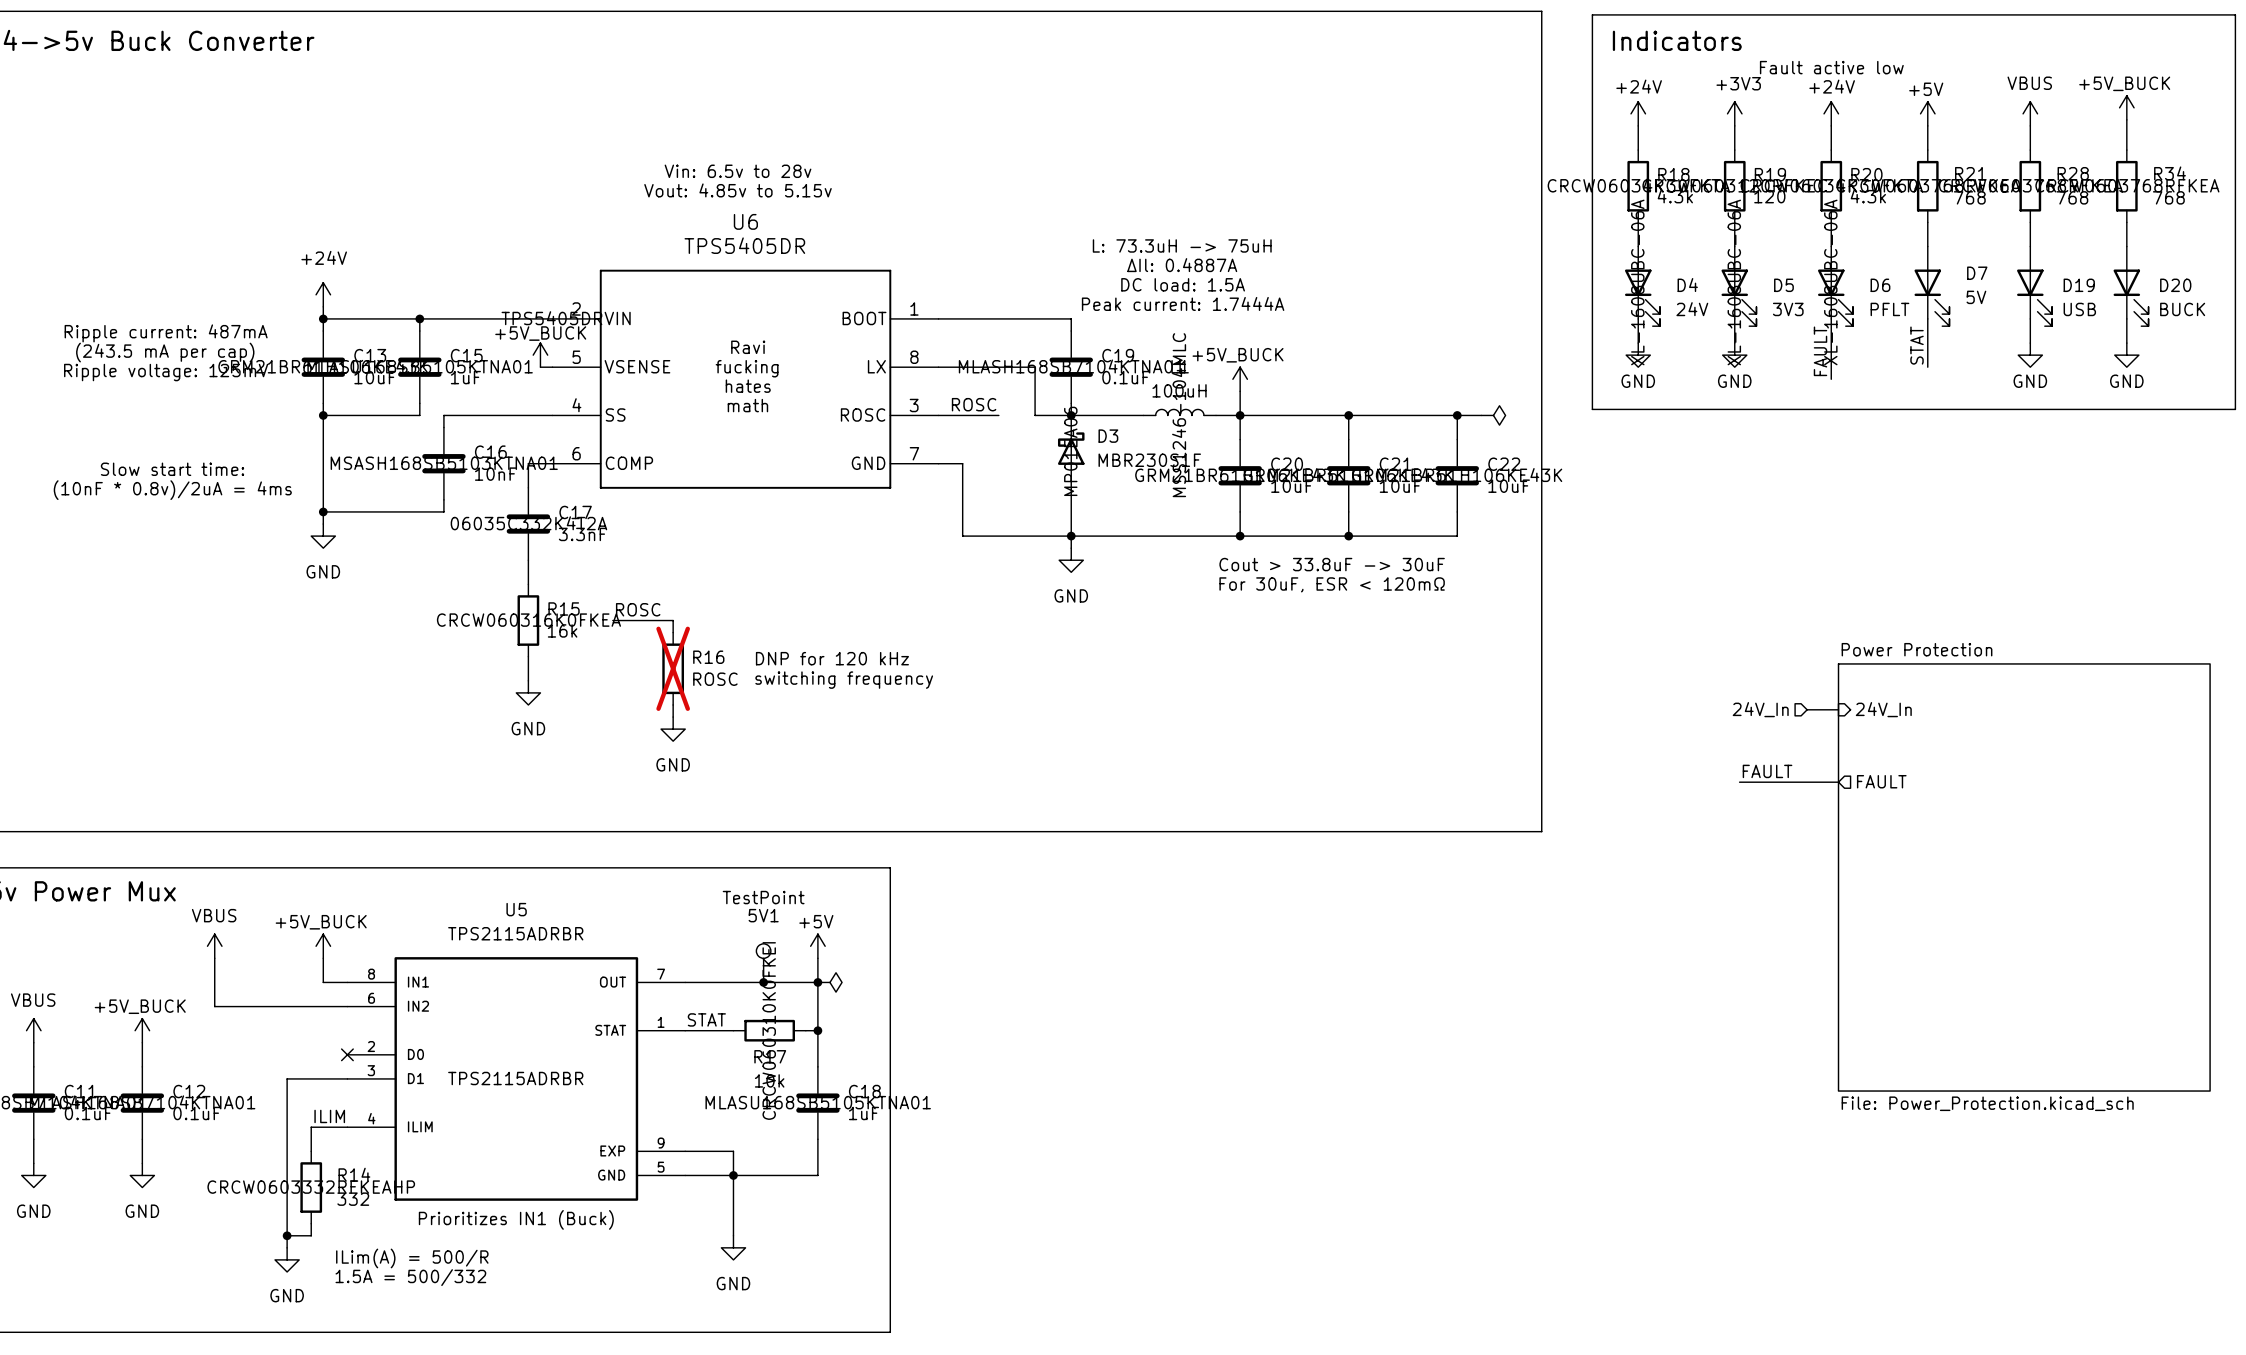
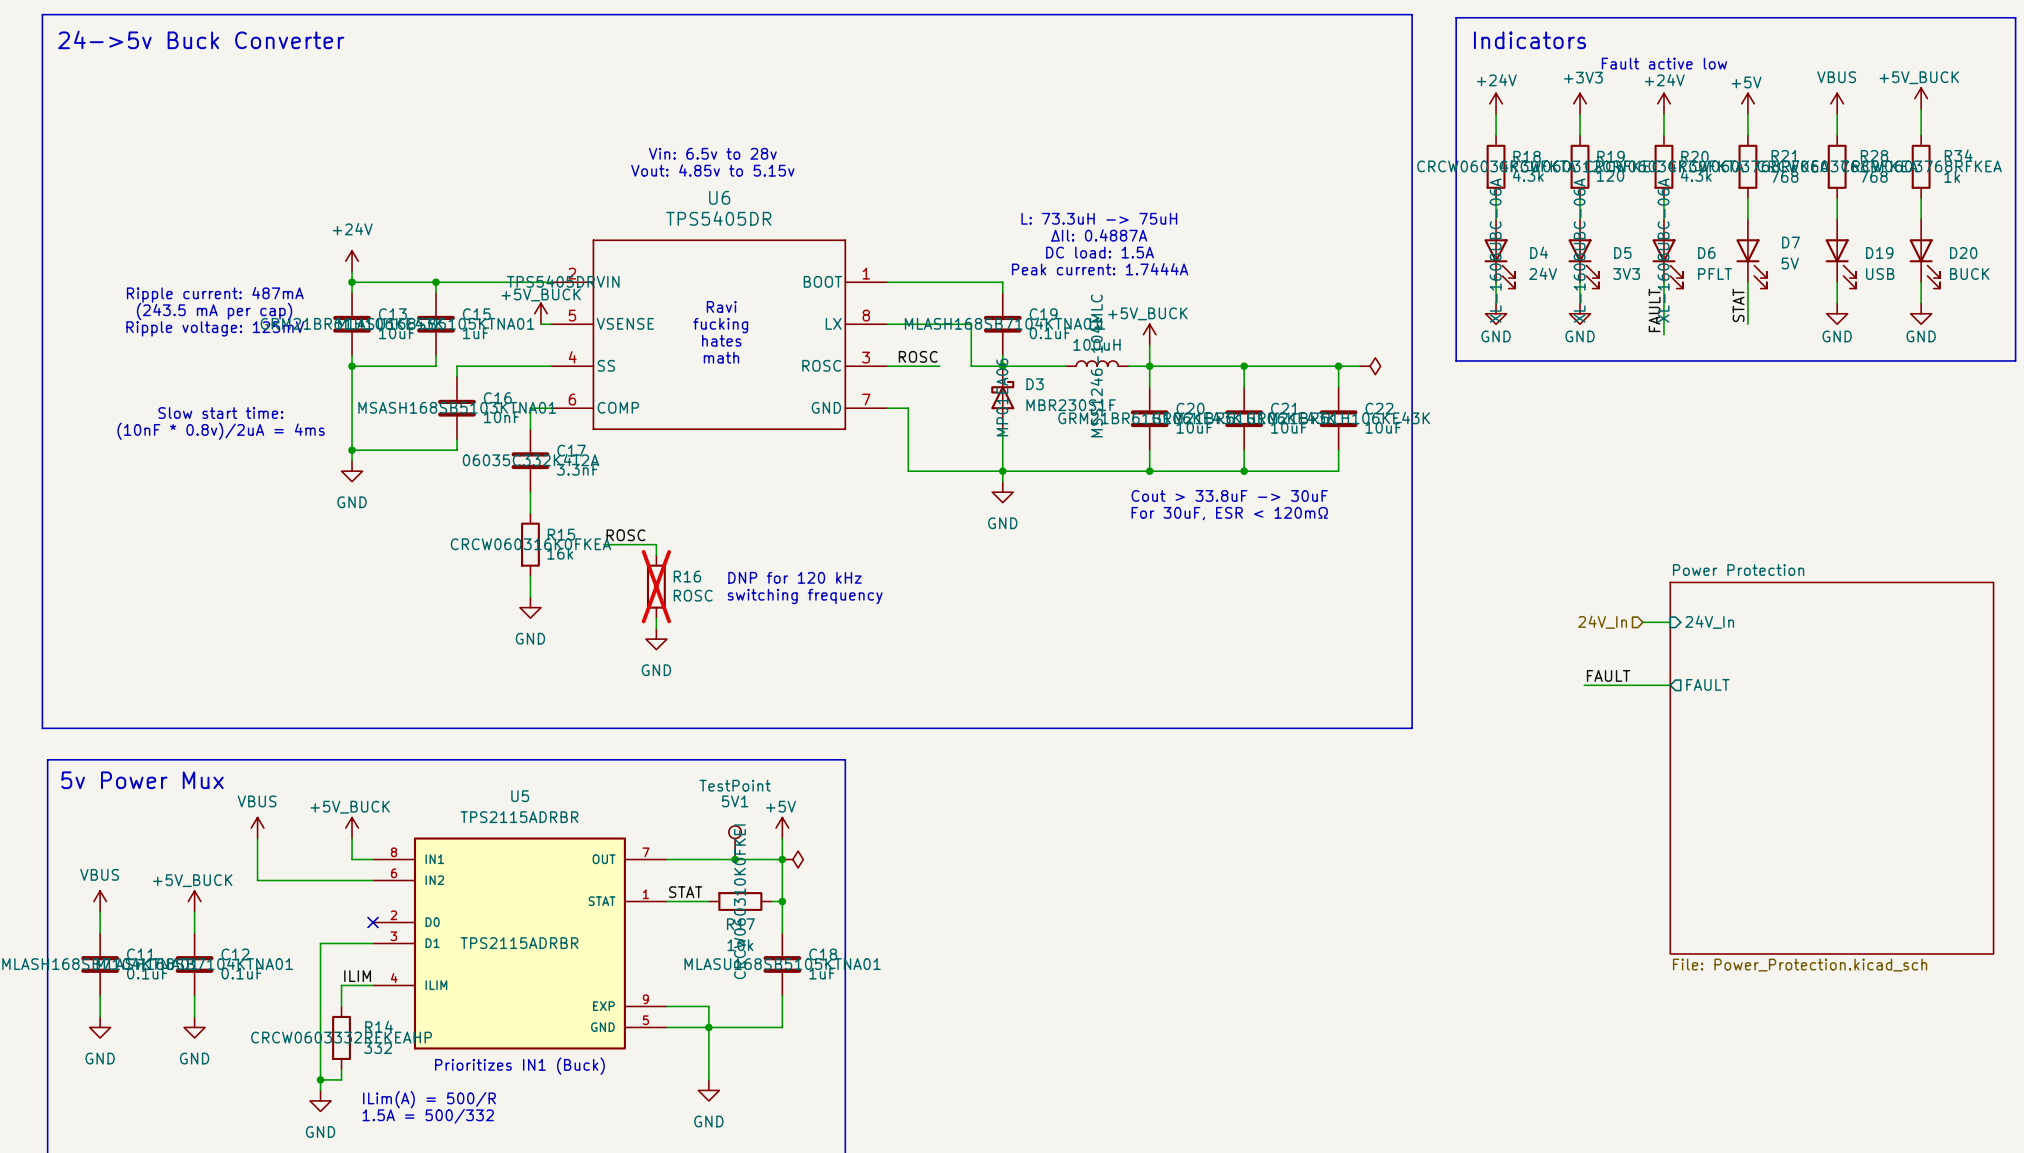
R34 value: 768 (2168, 197) -> 1k (1952, 176)

